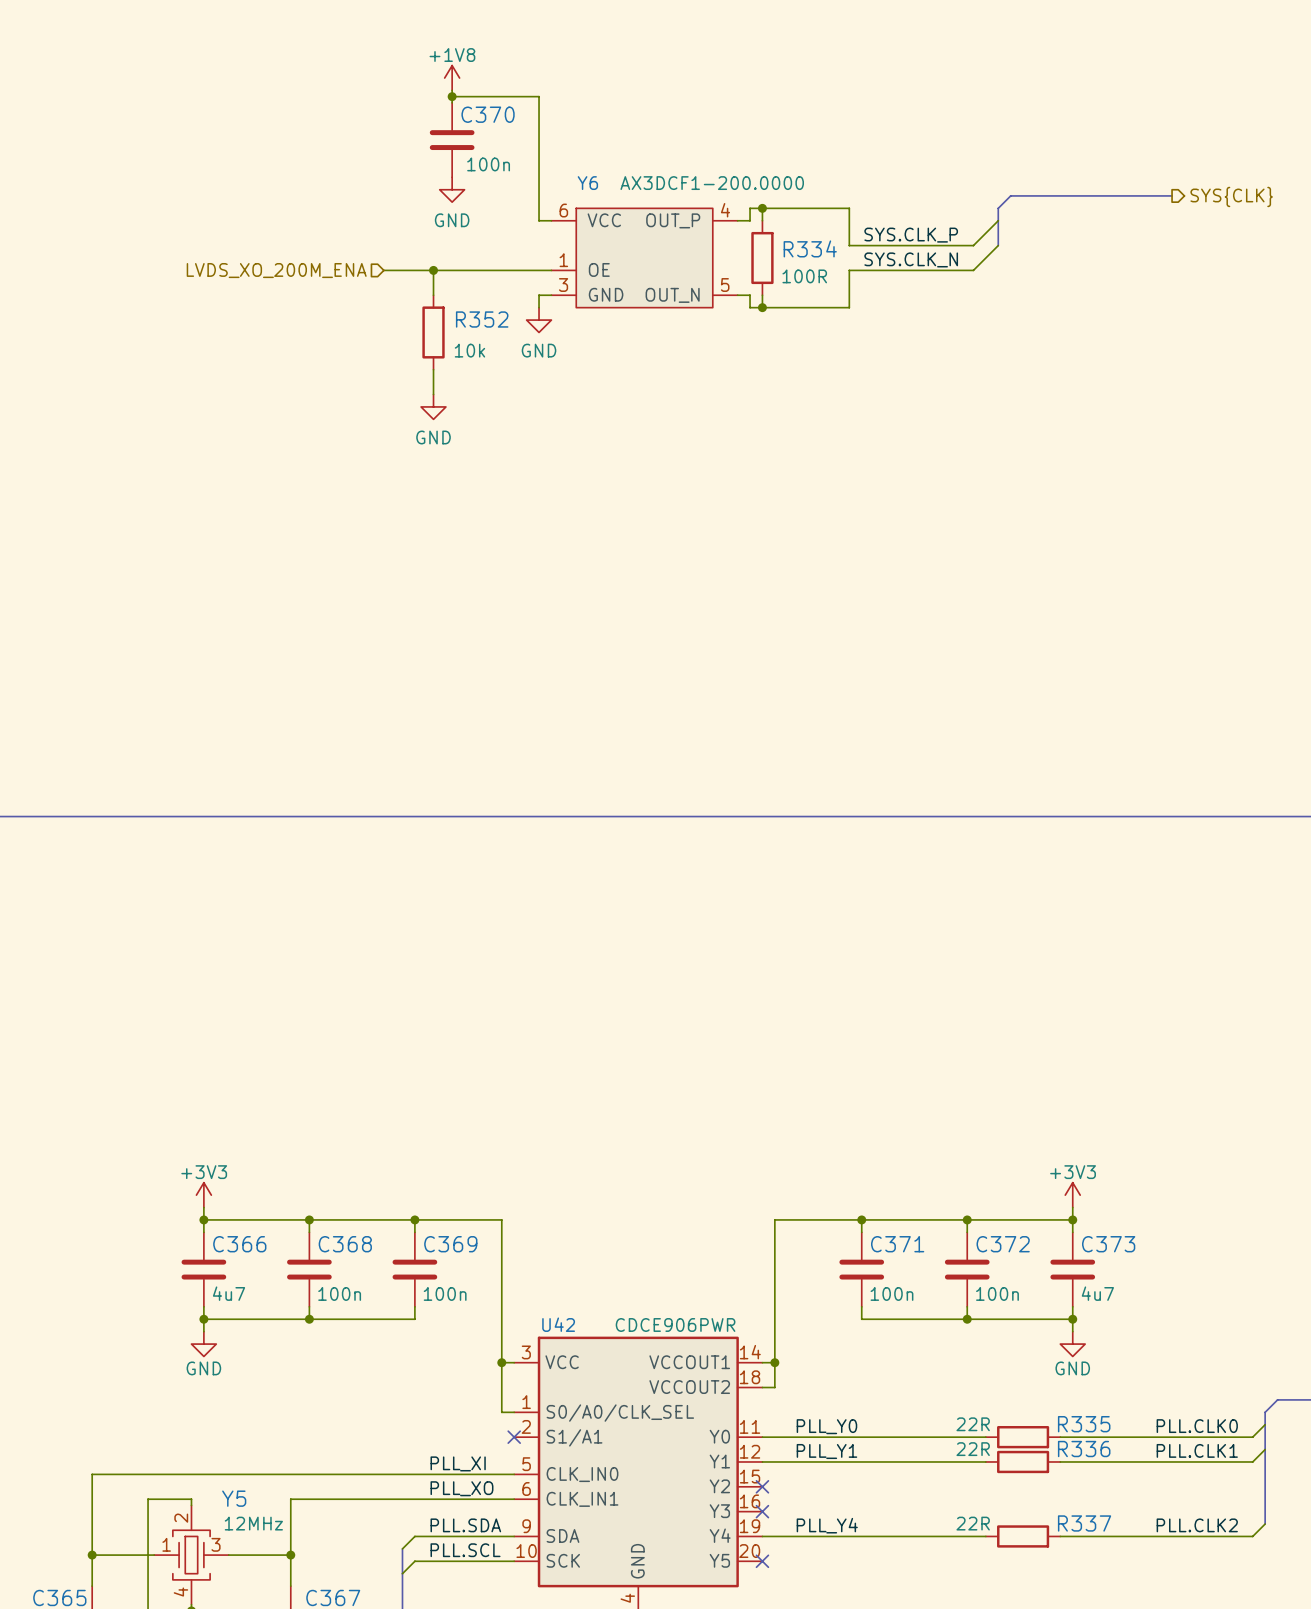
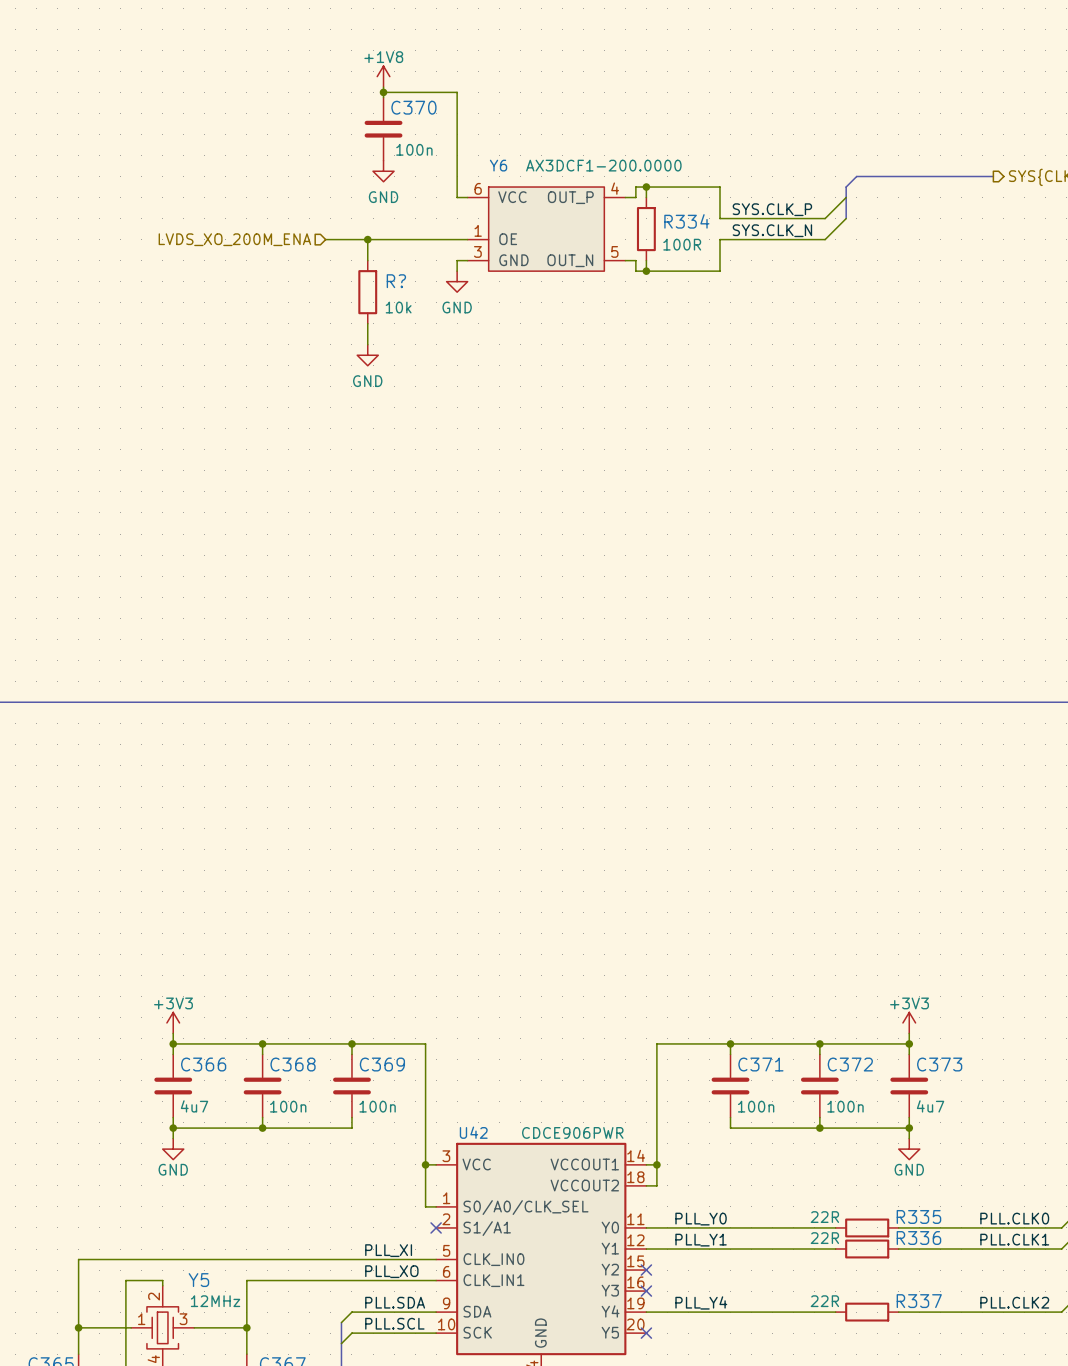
R352 name: R352 (482, 319) -> R? (396, 281)

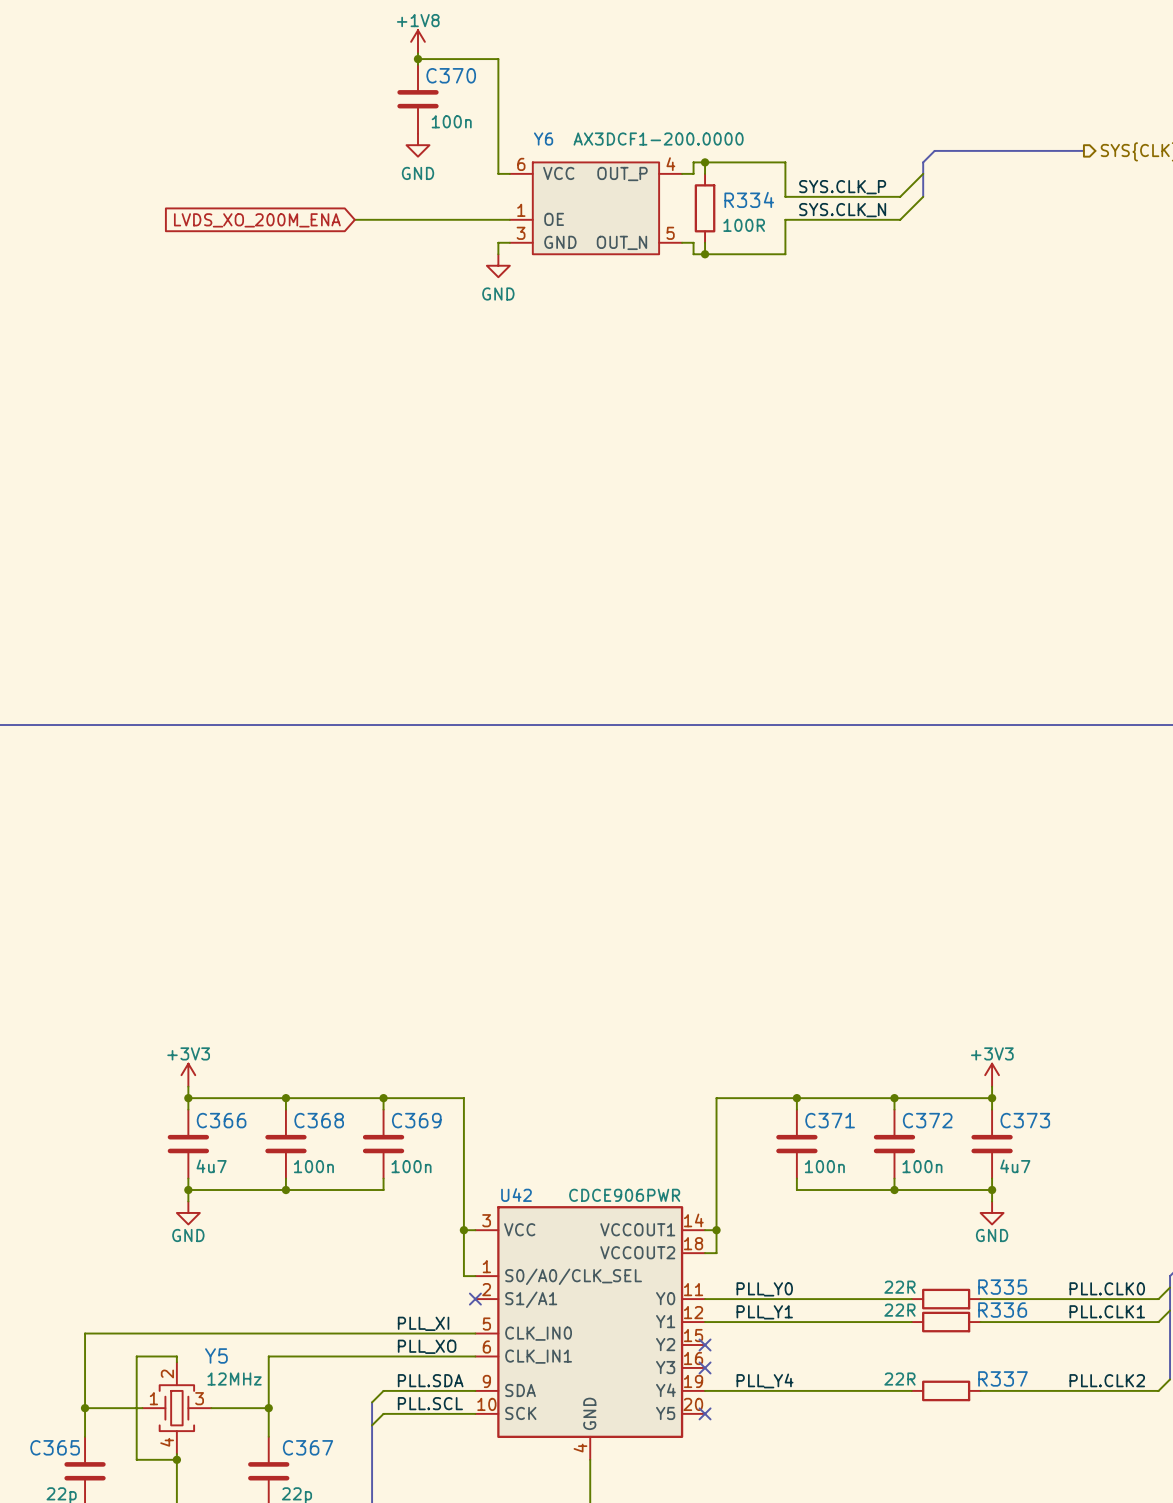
hierarchical label: LVDS_XO_200M_ENA (234, 239) -> none
wire: (367, 239) (367, 260) -> none
junction: (367, 239) -> none
global label: none -> LVDS_XO_200M_ENA (257, 220)
R?: (367, 292) -> none
wire: (367, 323) (367, 344) -> none
power symbol: GND (367, 355) -> none

